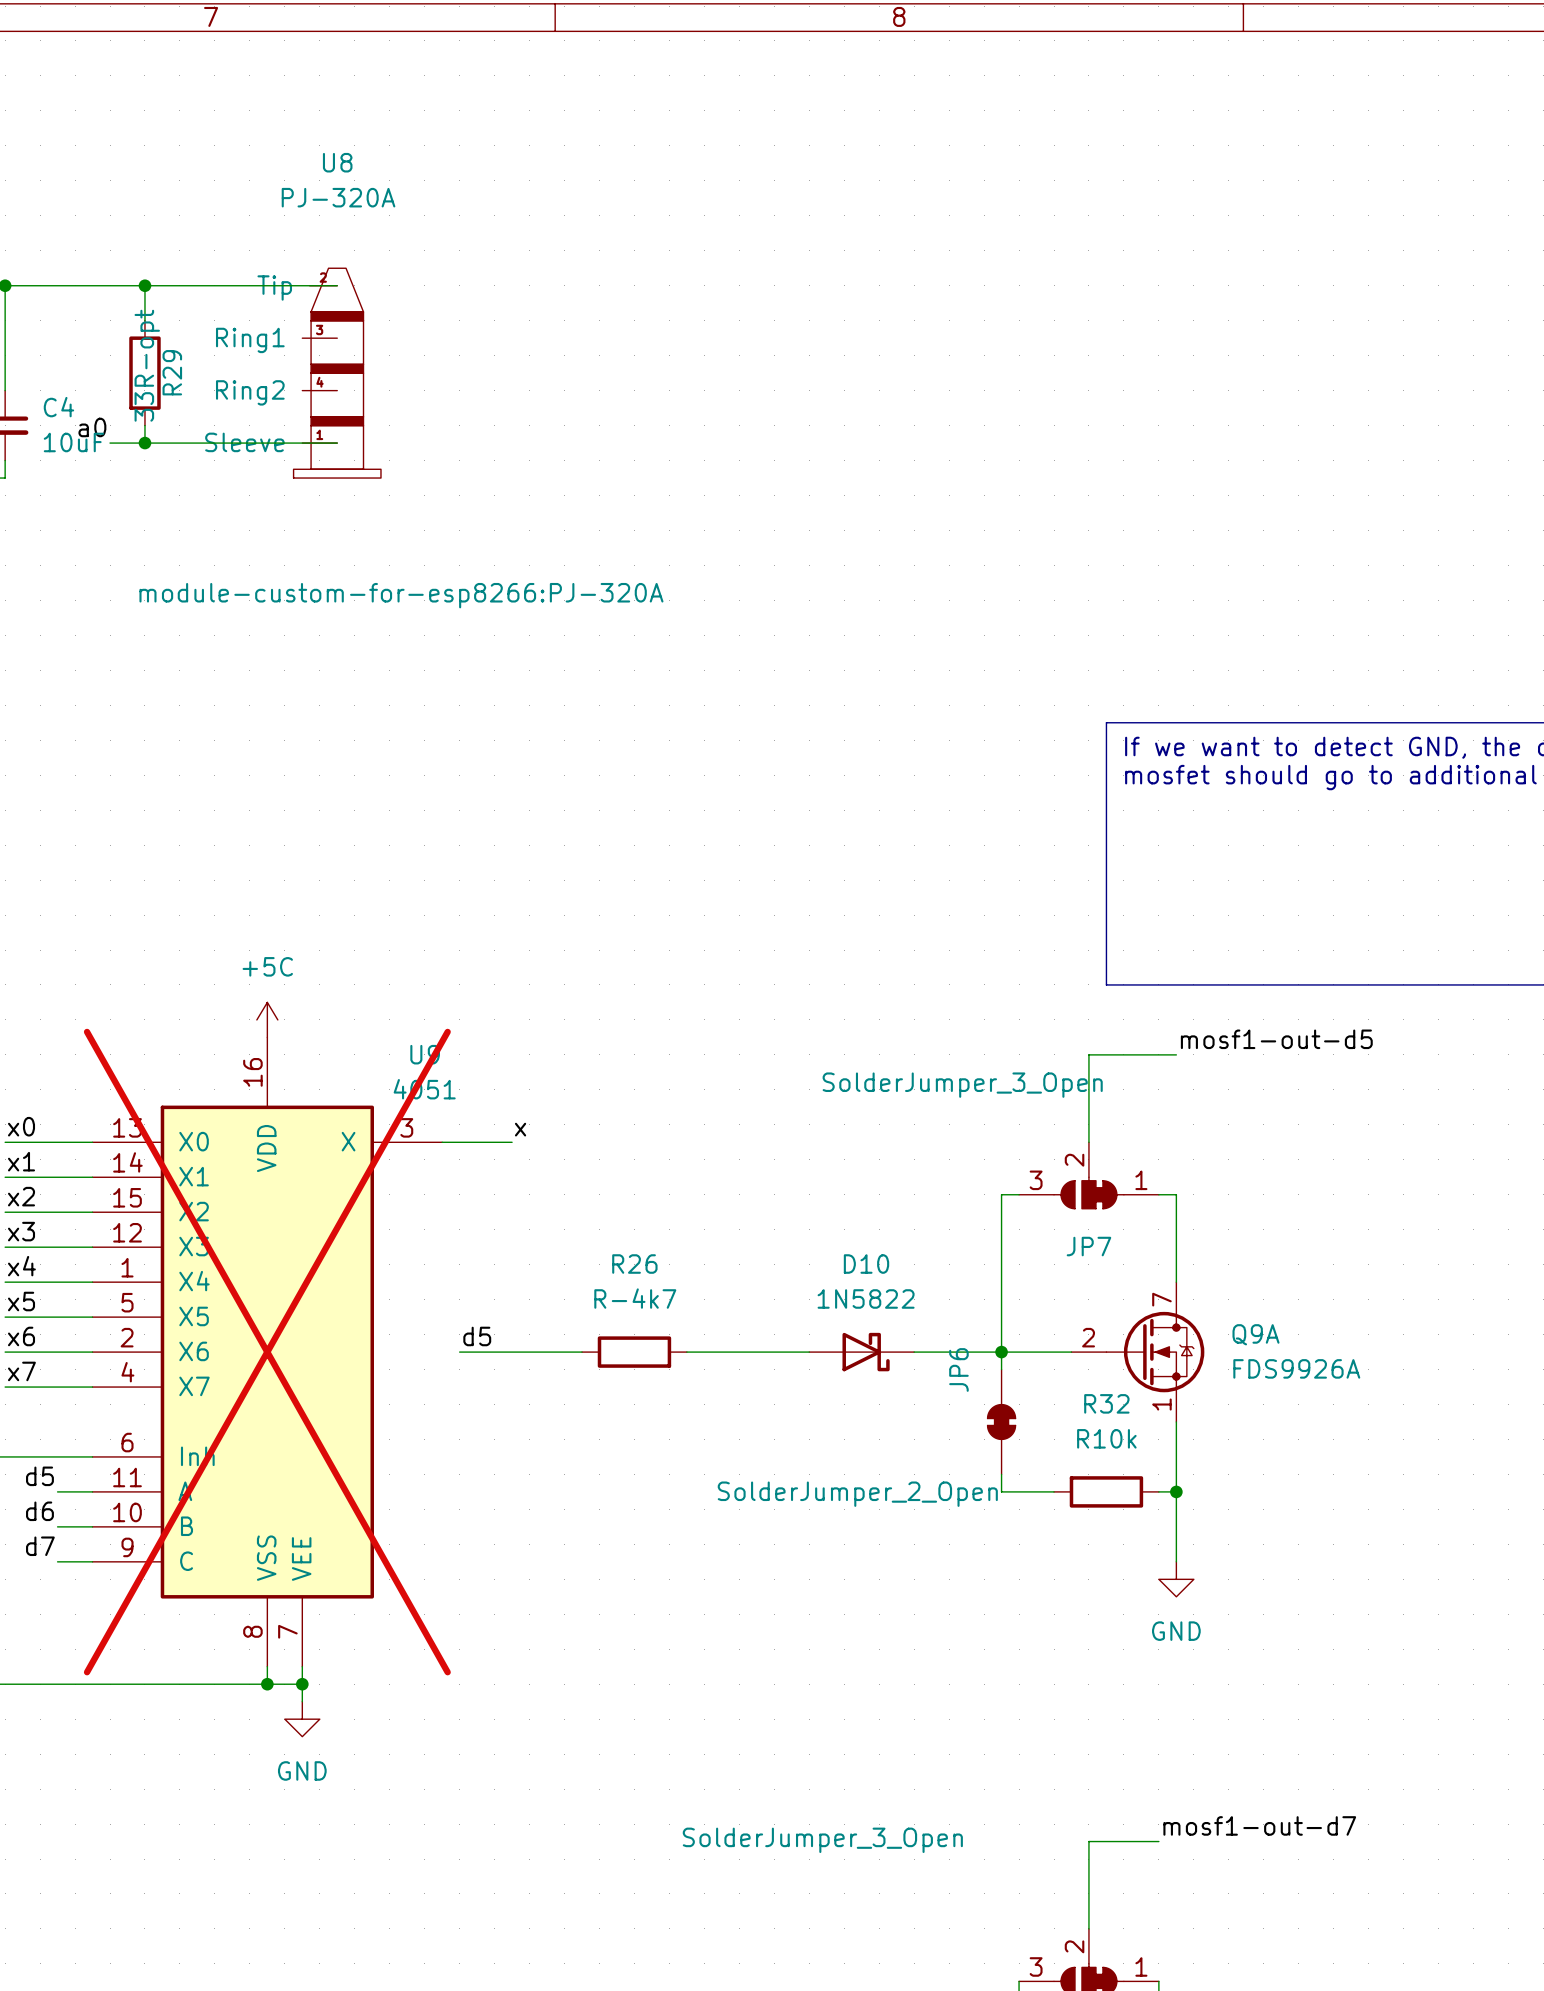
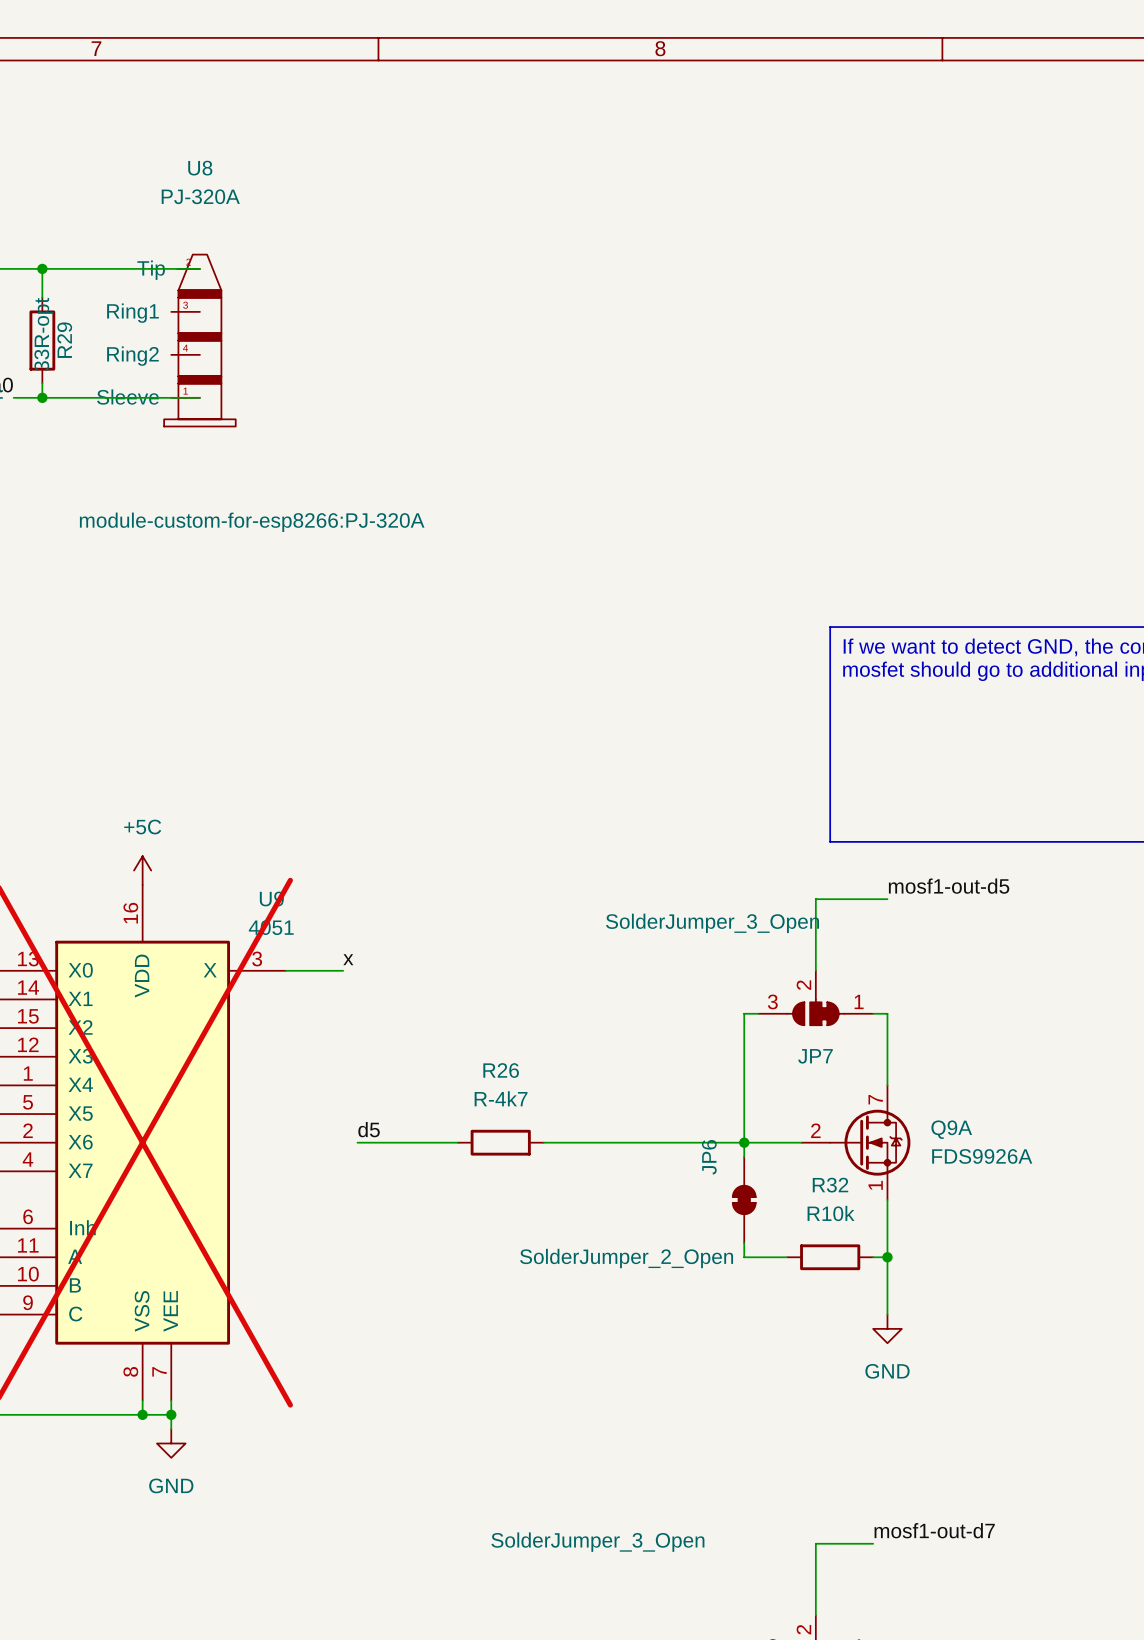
label position: d5 (477, 1336) -> d5 (369, 1129)
wire: (459, 1352) (529, 1352) -> none
R26 position: (634, 1352) -> (500, 1142)
wire: (686, 1352) (756, 1352) -> (400, 1142) (457, 1142)
D10: 1N5822 (861, 1352) -> none

